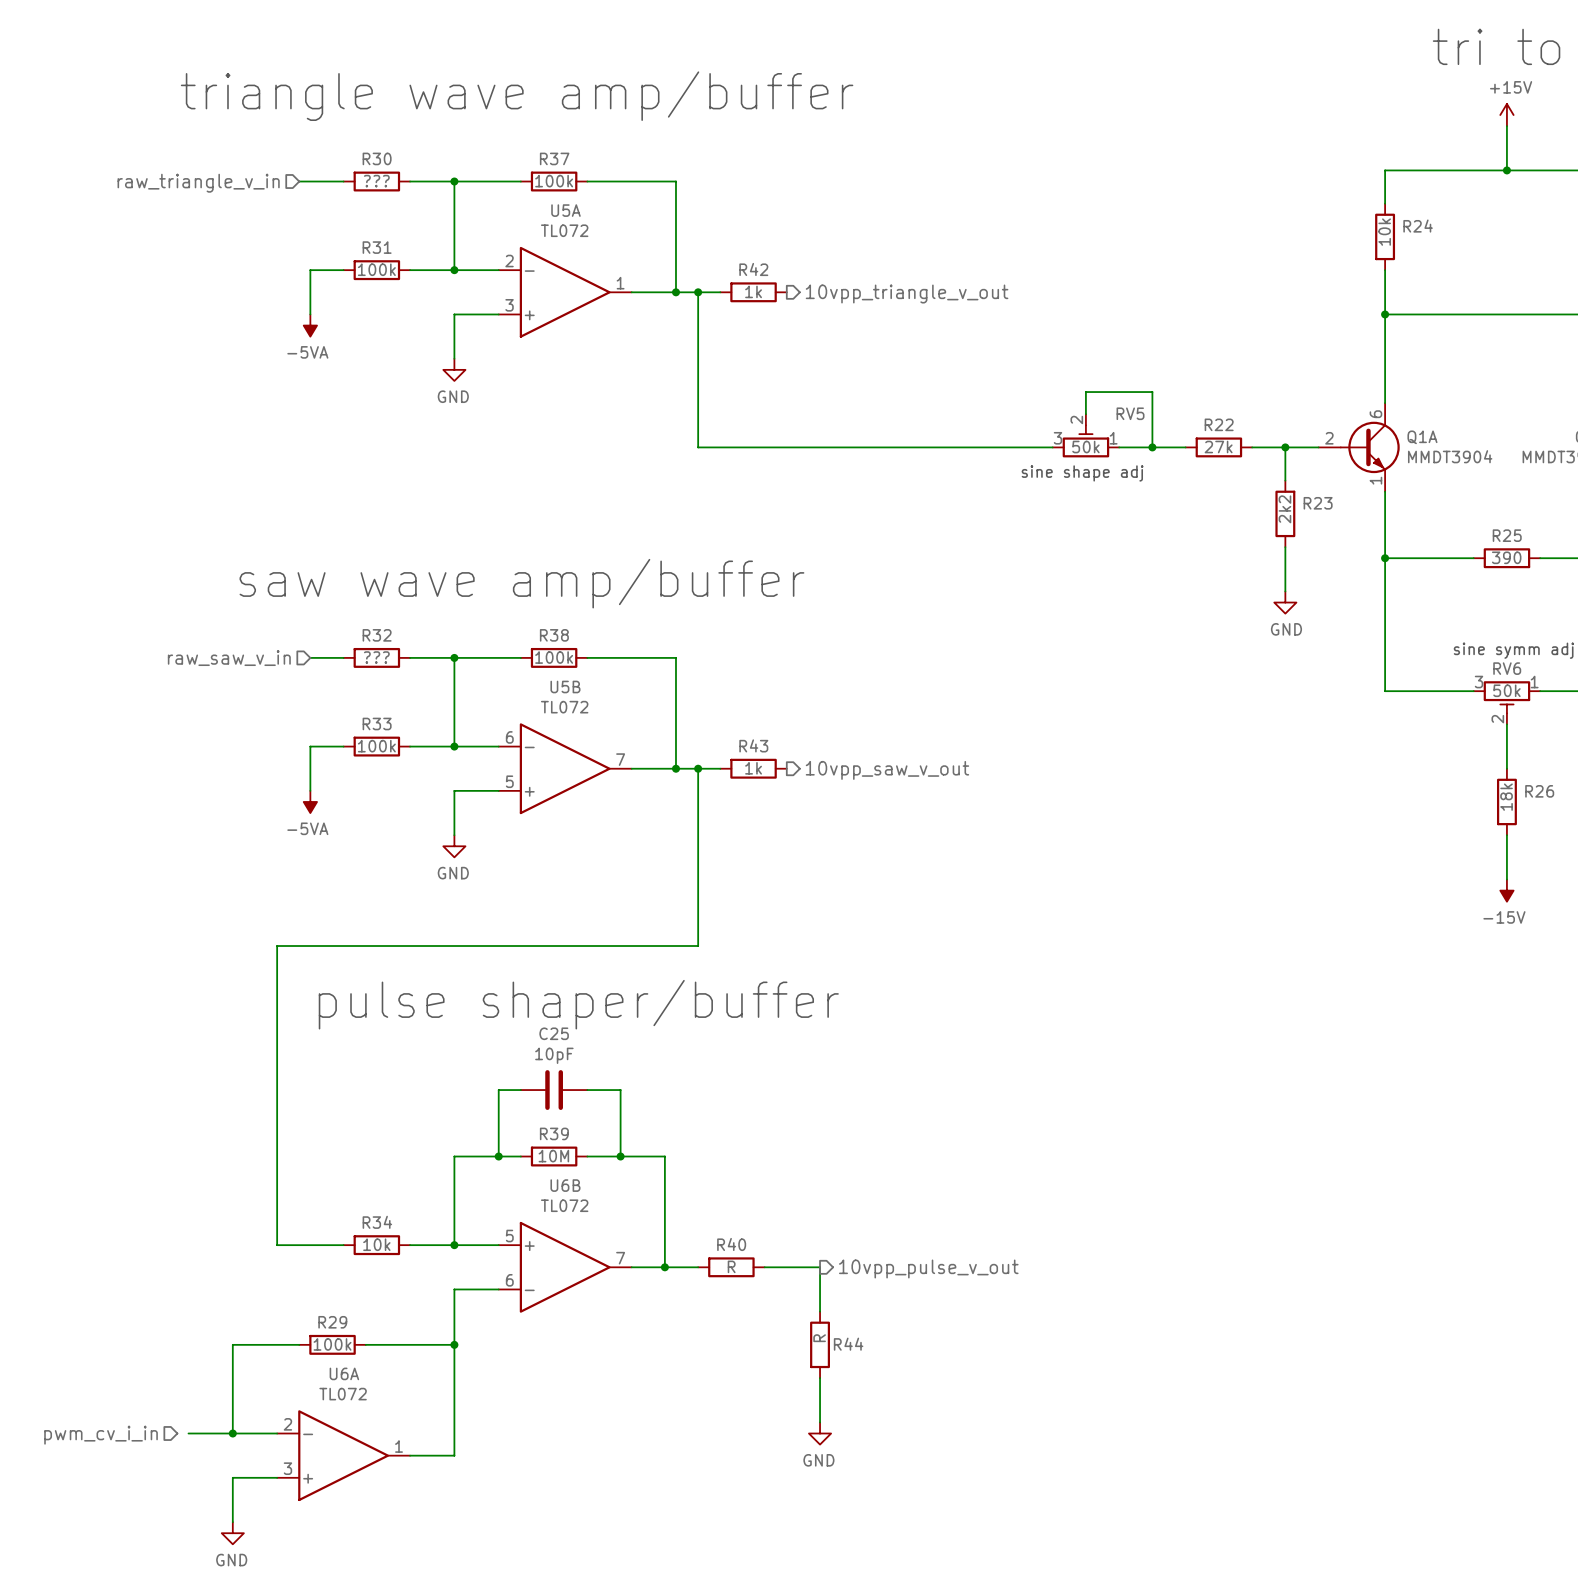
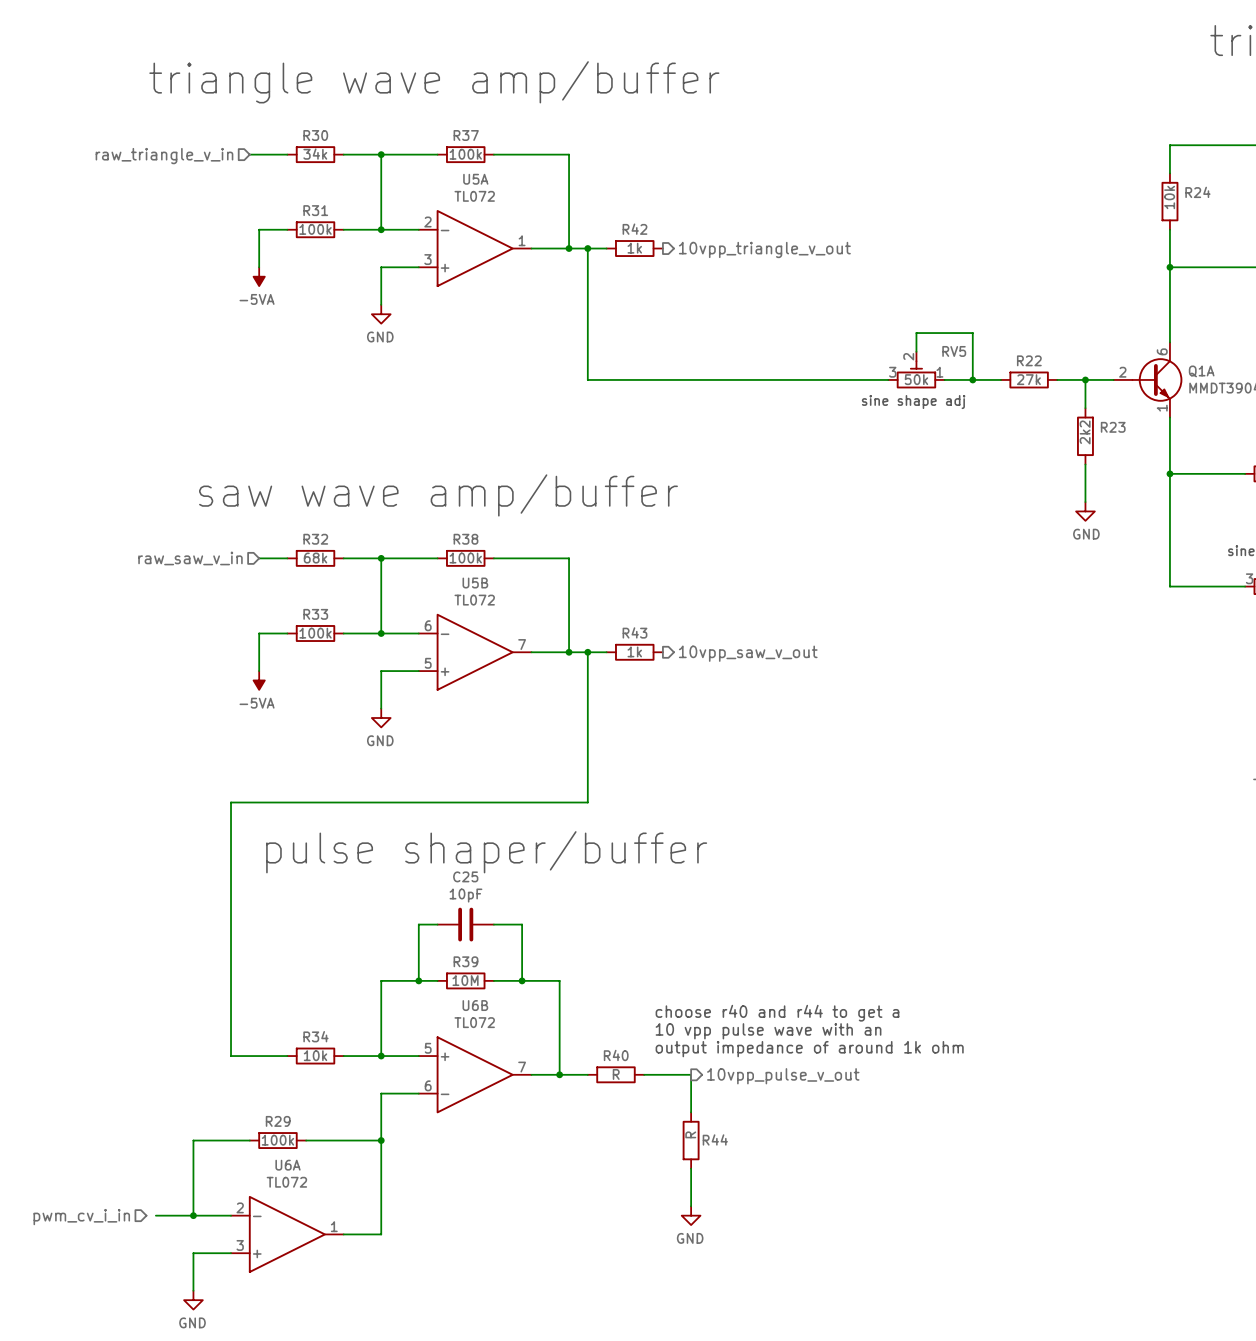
R30 value: ??? (376, 181) -> 34k (315, 154)
R32 value: ??? (376, 657) -> 68k (315, 558)
text: none -> choose r40 and r44 to get a (777, 1013)
text: none -> 10 vpp pulse wave with an (768, 1031)
text: none -> output impedance of around 1k ohm (809, 1049)

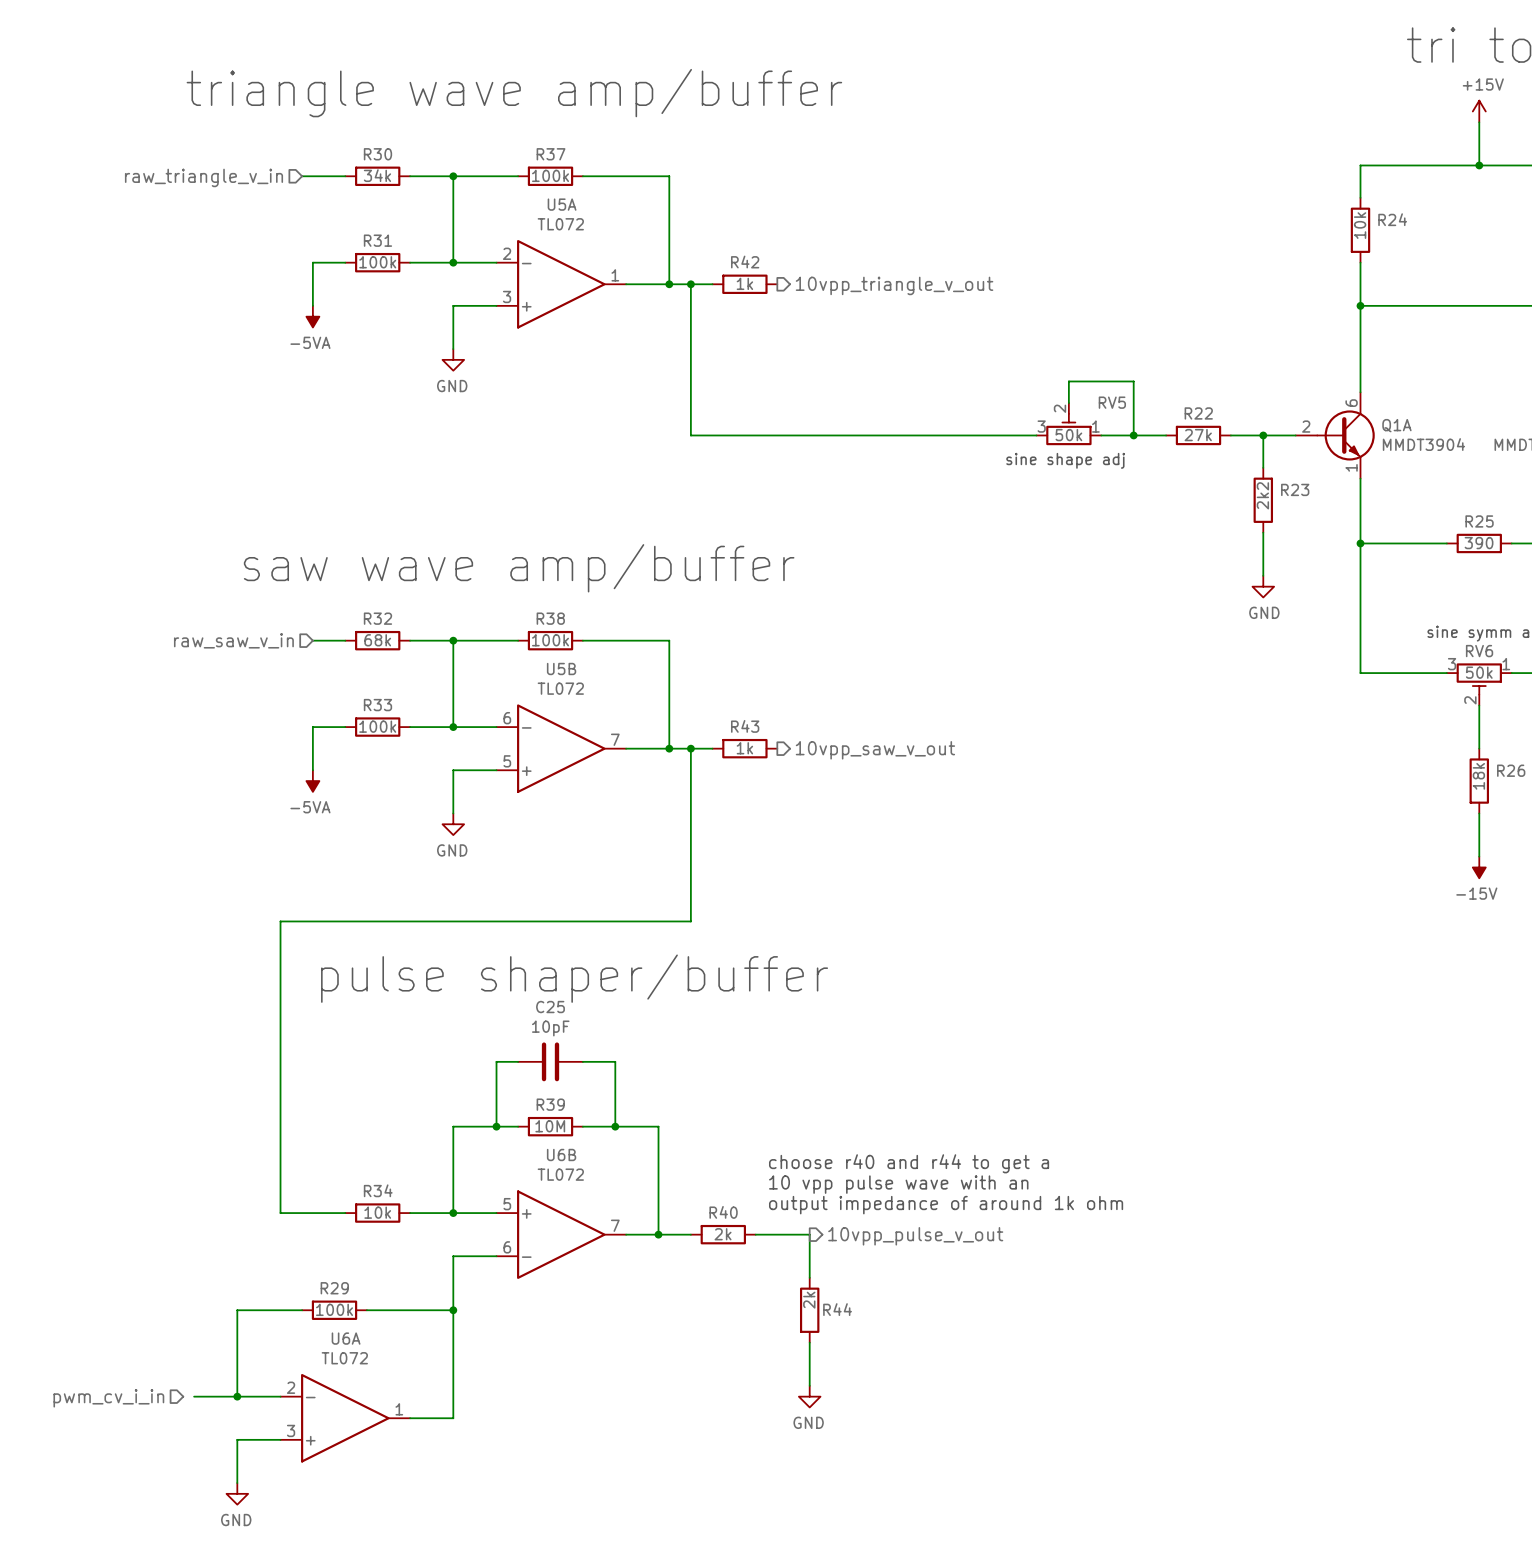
R40 value: R (616, 1074) -> 2k (723, 1234)
R44 value: R (690, 1134) -> 2k (809, 1300)

